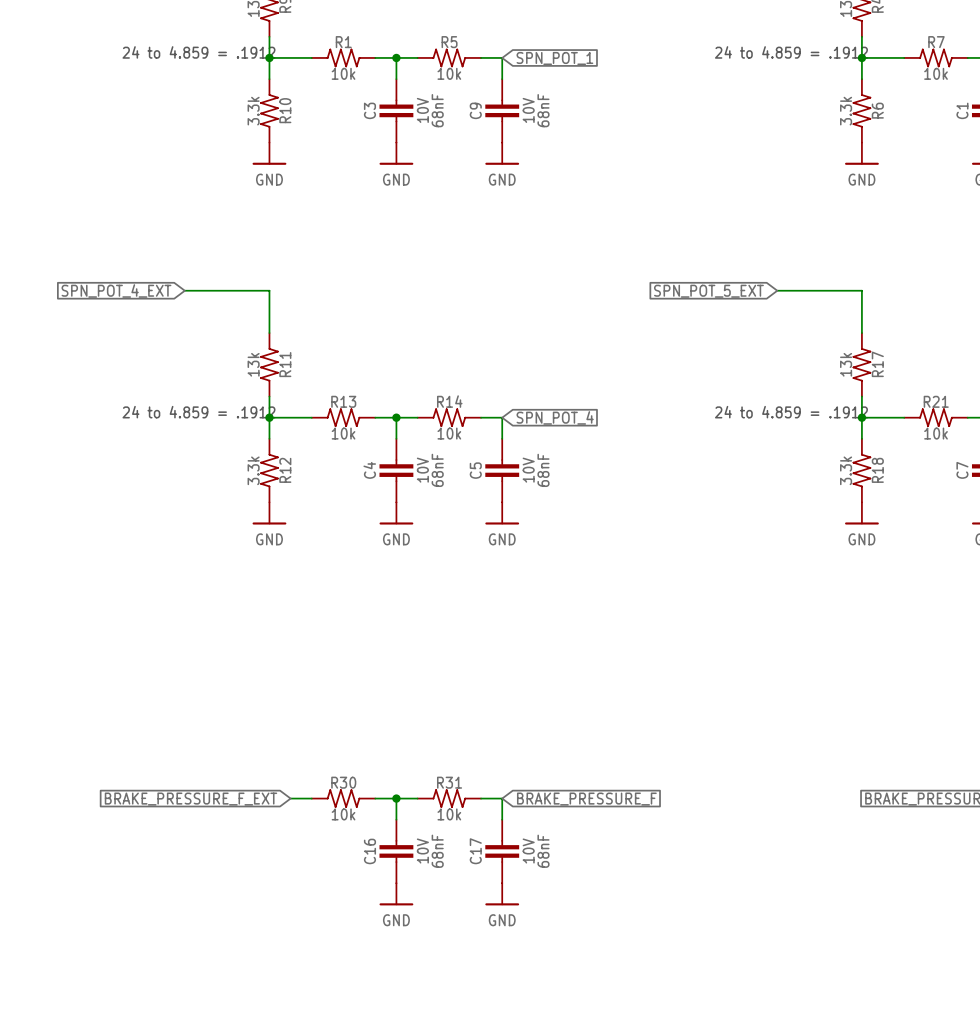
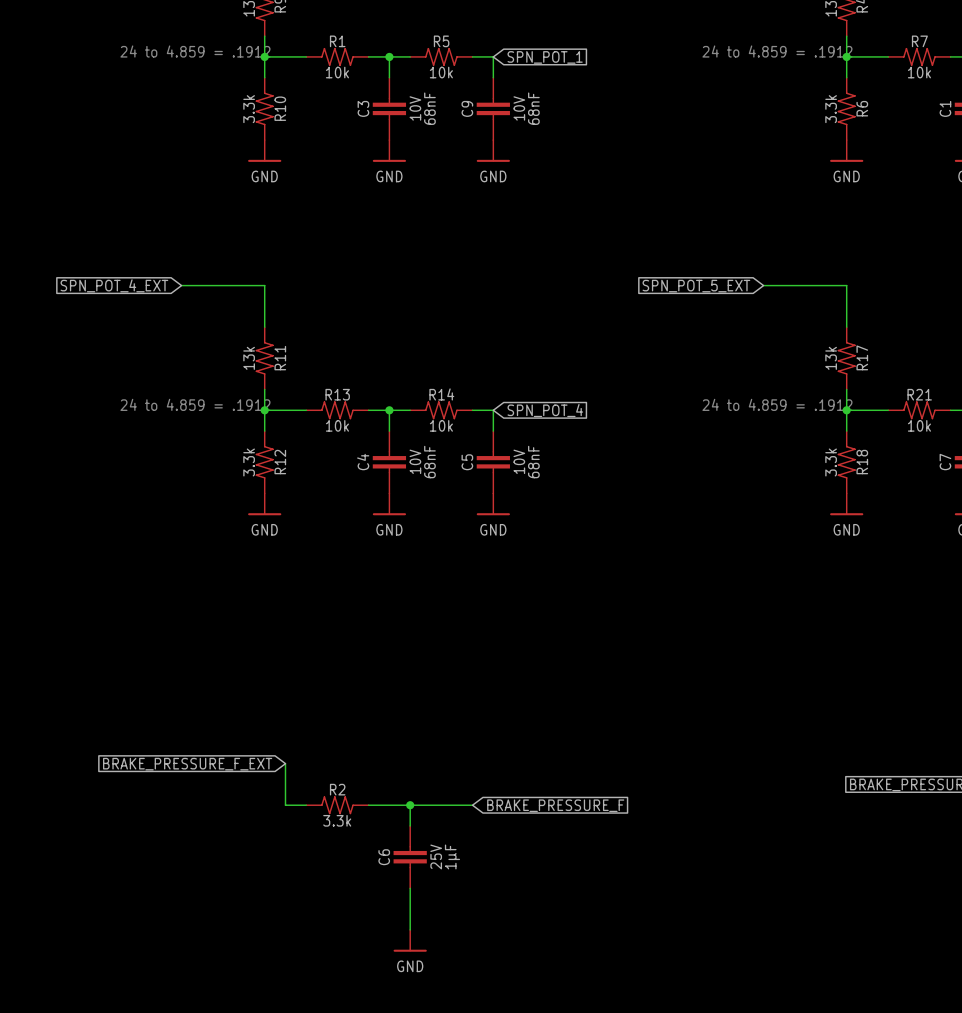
wire: none -> (285, 763) (285, 805) (306, 805)
wire: (290, 798) (311, 798) -> none
R30: (343, 798) -> none
wire: (375, 798) (417, 798) -> none
wire: (396, 798) (396, 819) -> (410, 805) (410, 826)
junction position: (396, 798) -> (410, 805)
R31: (449, 798) -> none
wire: (481, 798) (502, 798) (502, 819) -> none
global label position: BRAKE_PRESSURE_F_EXT (191, 799) -> BRAKE_PRESSURE_F_EXT (187, 764)
global label position: BRAKE_PRESSURE_F (586, 799) -> BRAKE_PRESSURE_F (555, 805)
R2: none -> (337, 805)
wire: none -> (368, 805) (472, 805)
C16: (396, 851) -> none
C17: (502, 851) -> none
C6: none -> (410, 857)
power symbol: GND (396, 894) -> none
power symbol: GND (502, 894) -> none
wire: none -> (410, 888) (410, 929)
power symbol: none -> GND (410, 940)

